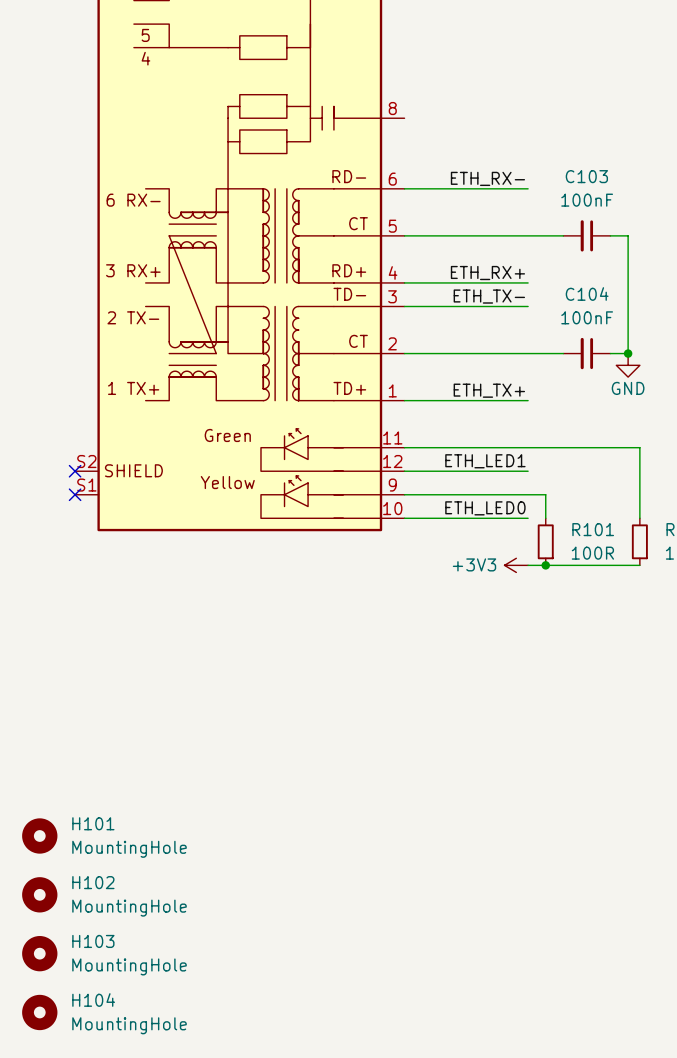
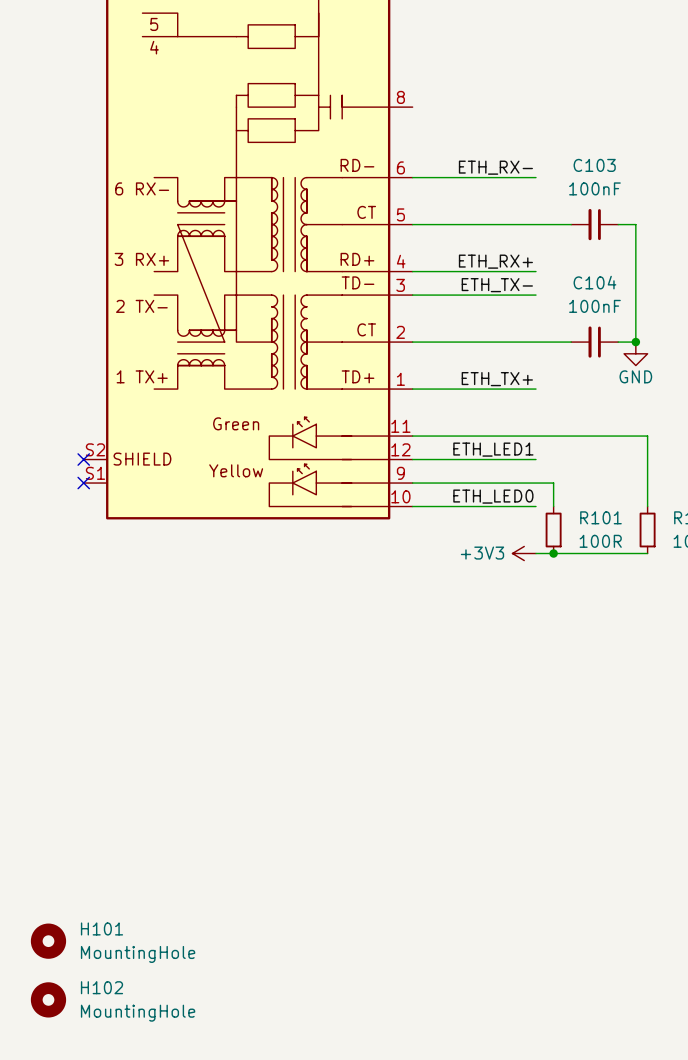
H101: MountingHole (39, 835) -> none
H102: MountingHole (39, 894) -> none
H103 name: H103 (93, 941) -> H101 (101, 928)
H104 name: H104 (93, 1000) -> H102 (101, 987)

